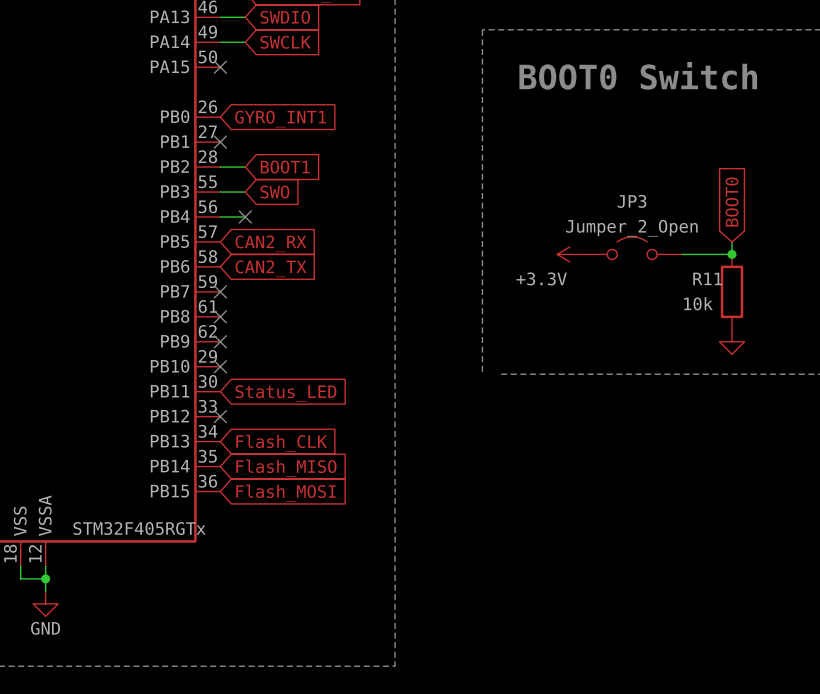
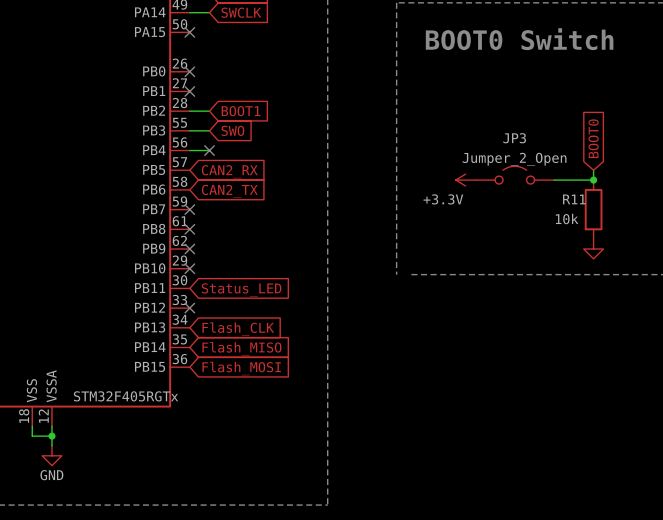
no-connect mark: none -> (189, 71)
global label: GYRO_INT1 (280, 119) -> none

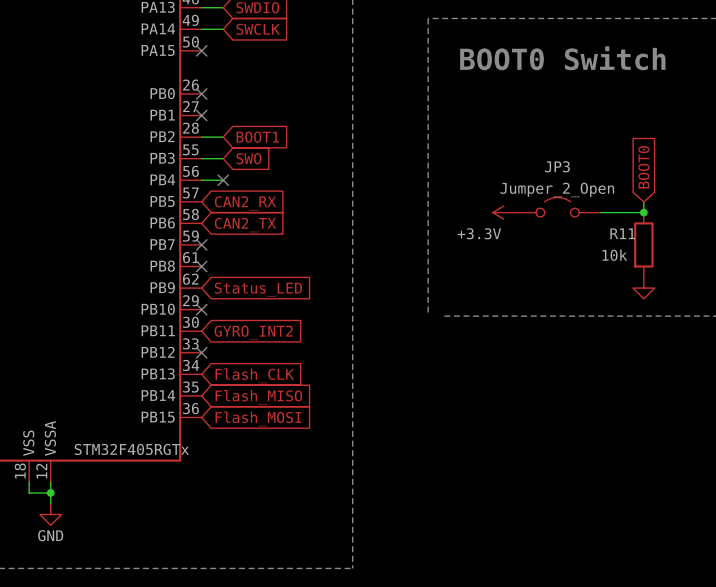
no-connect mark: (189, 249) -> none
global label: none -> Status_LED (258, 289)
global label: Status_LED (241, 289) -> GYRO_INT2 (253, 332)

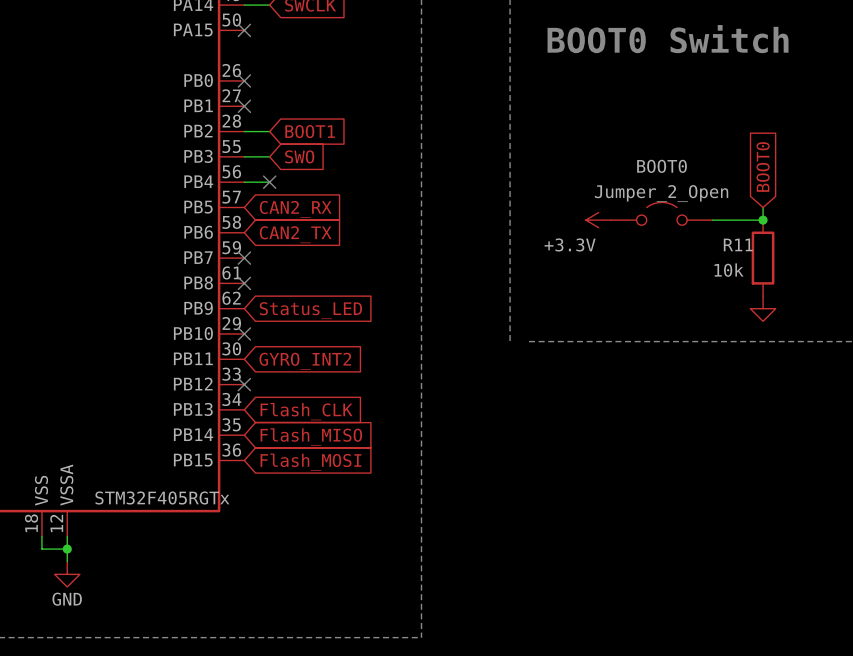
JP3 name: JP3 (557, 166) -> BOOT0 (662, 166)

